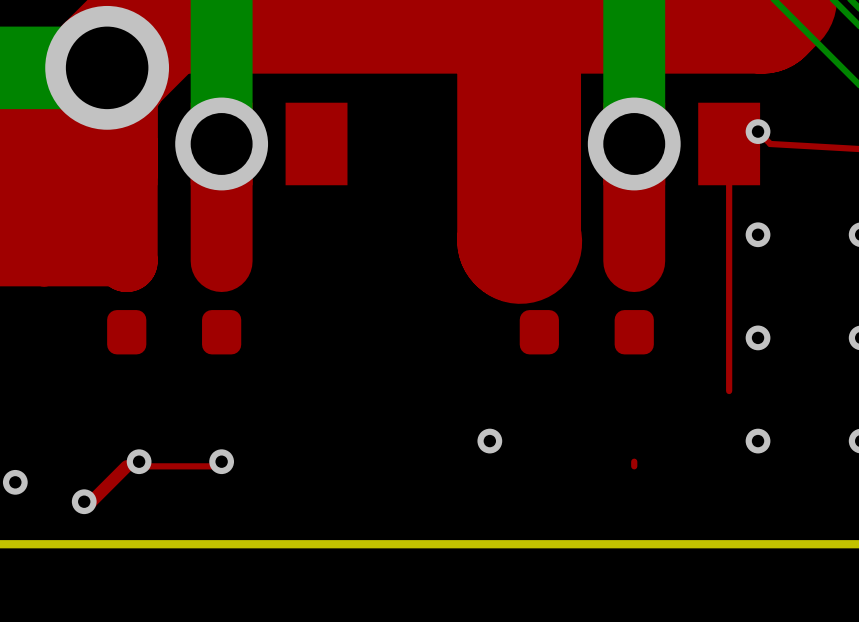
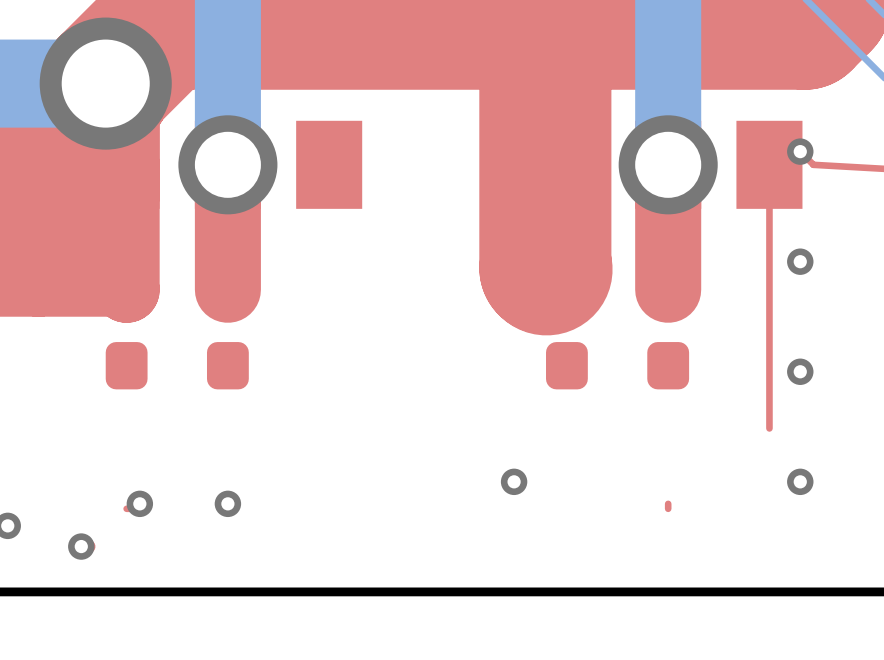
top track: (126, 466) (91, 501) -> none
top track: (216, 466) (143, 466) -> none

